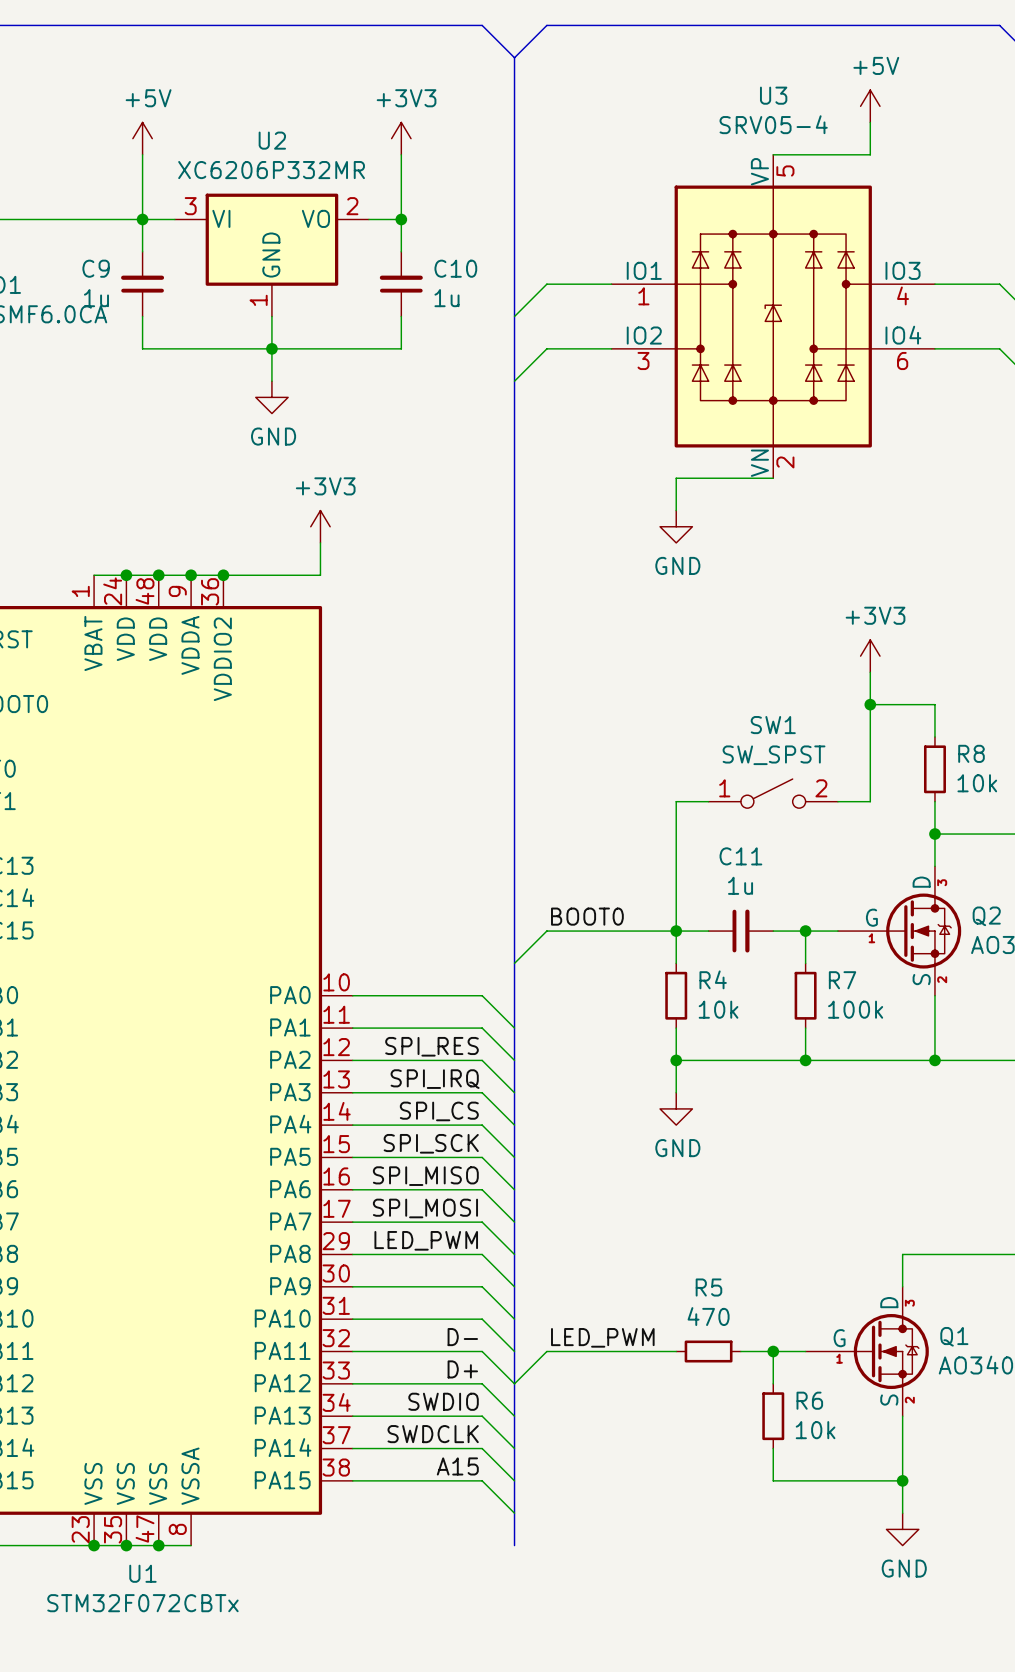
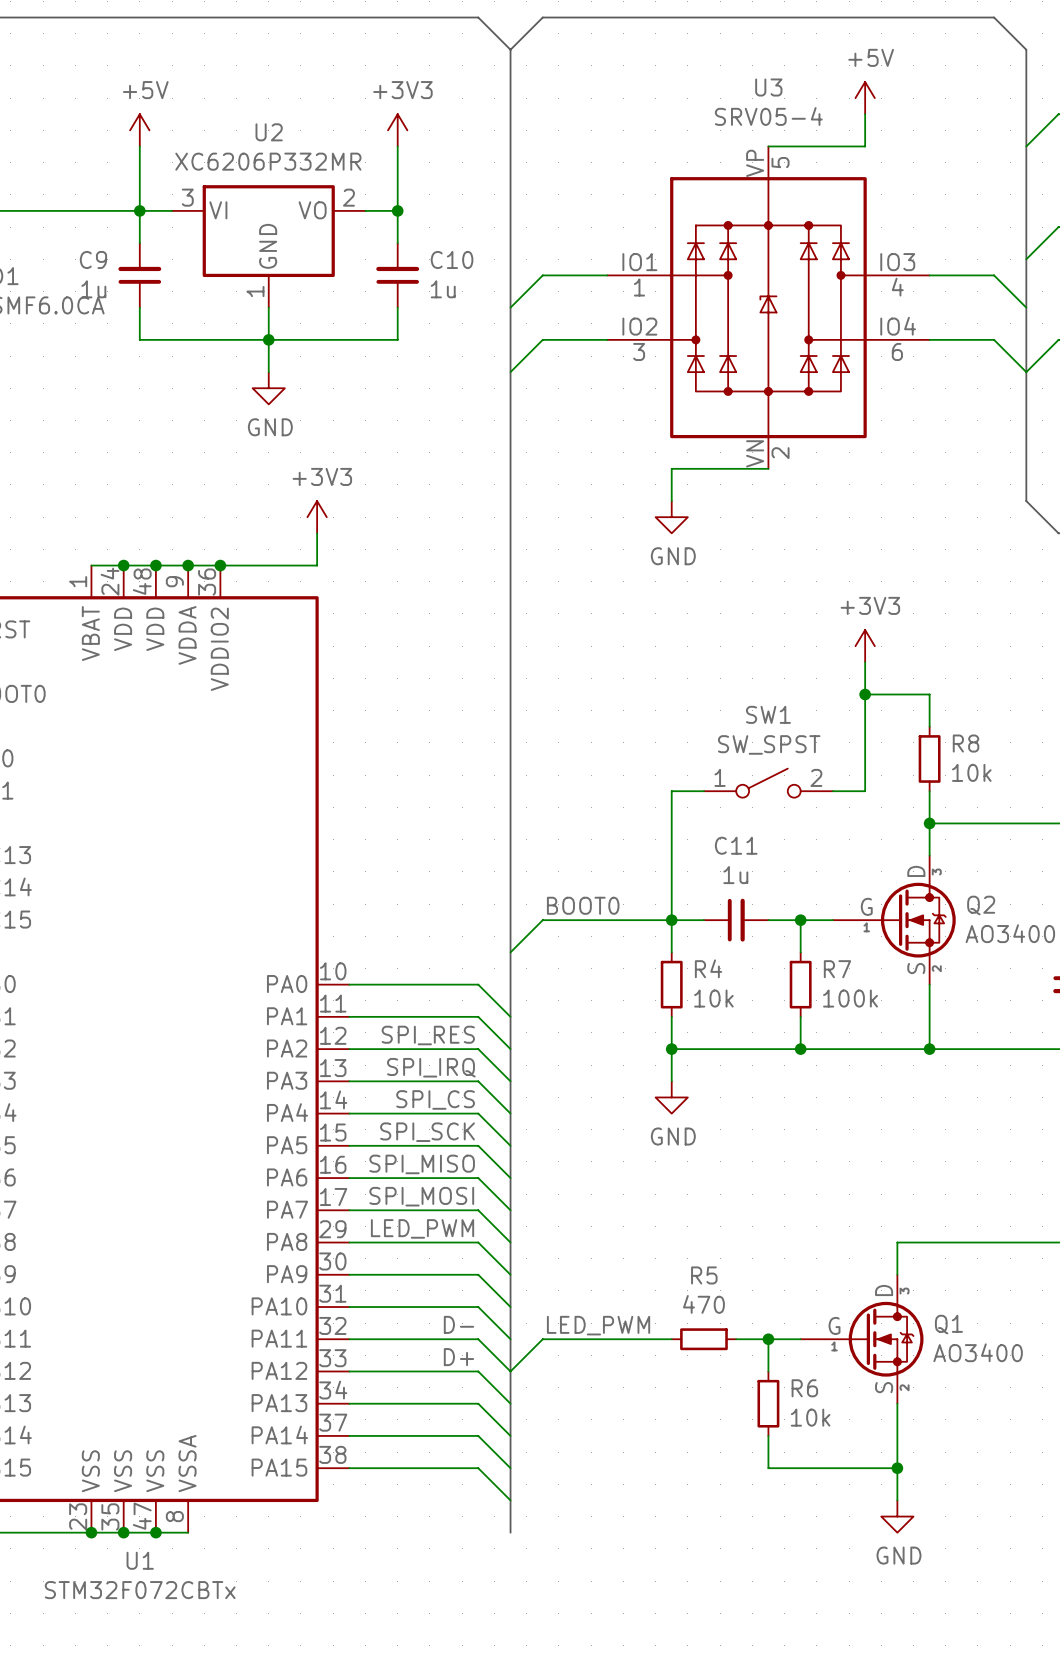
label: SWDIO (443, 1401) -> none
label: SWDCLK (433, 1434) -> none
label: A15 (457, 1466) -> none

